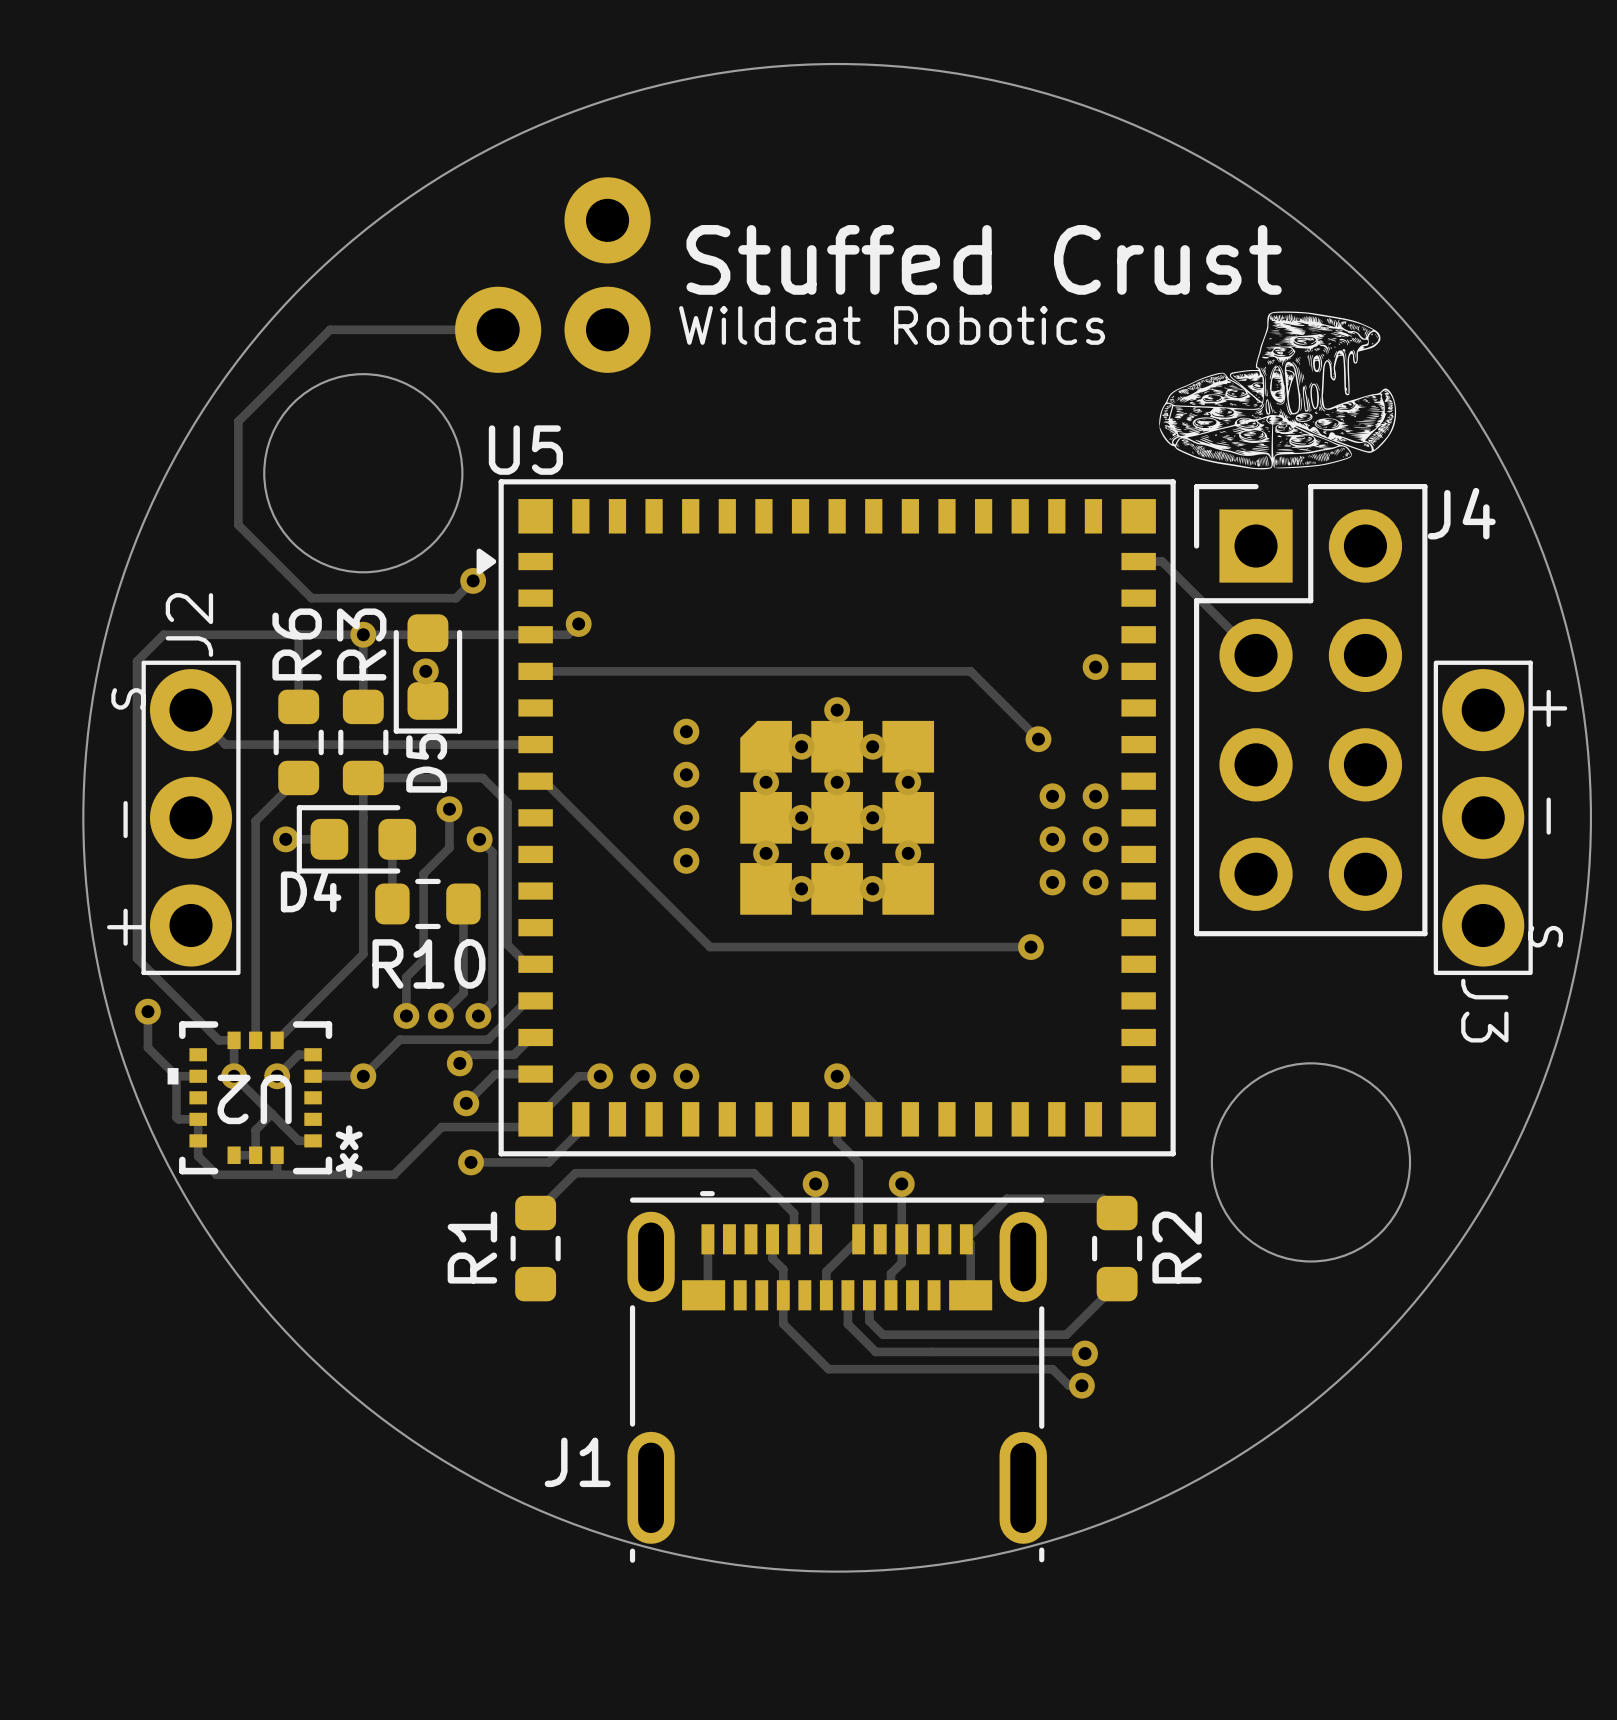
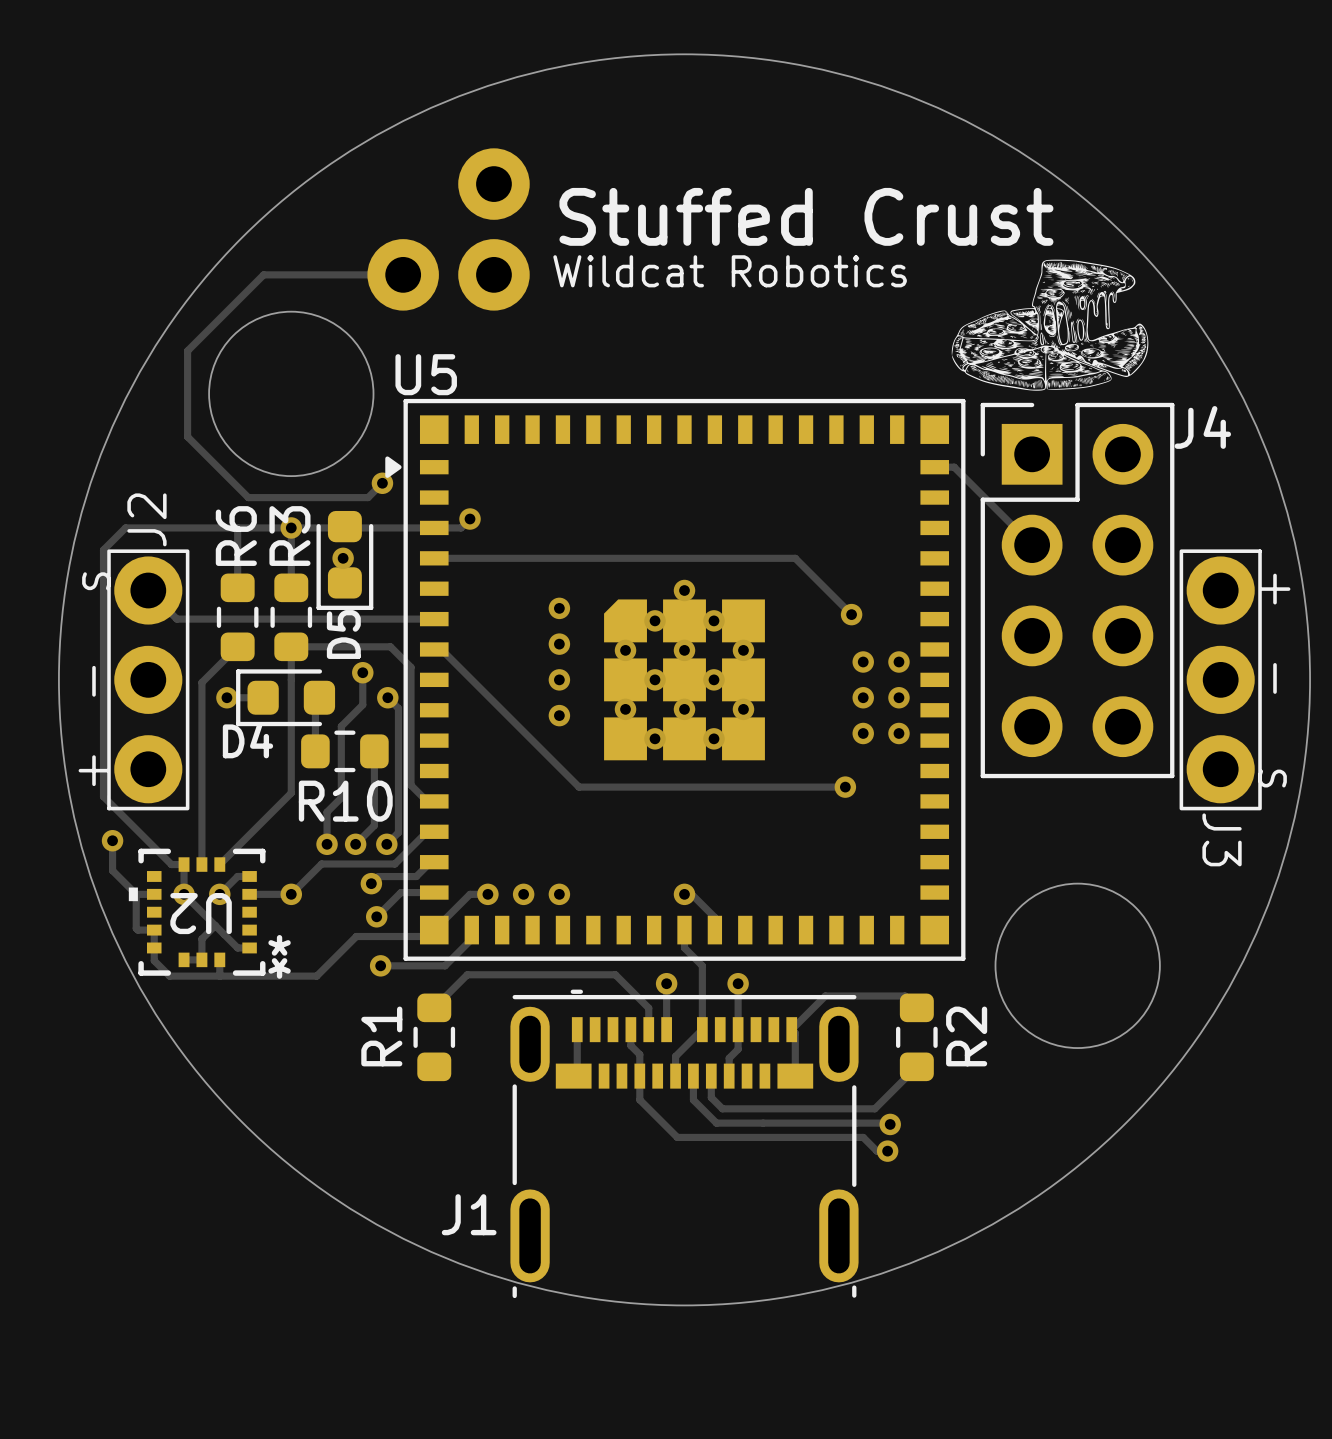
via: (1095, 667) -> none

